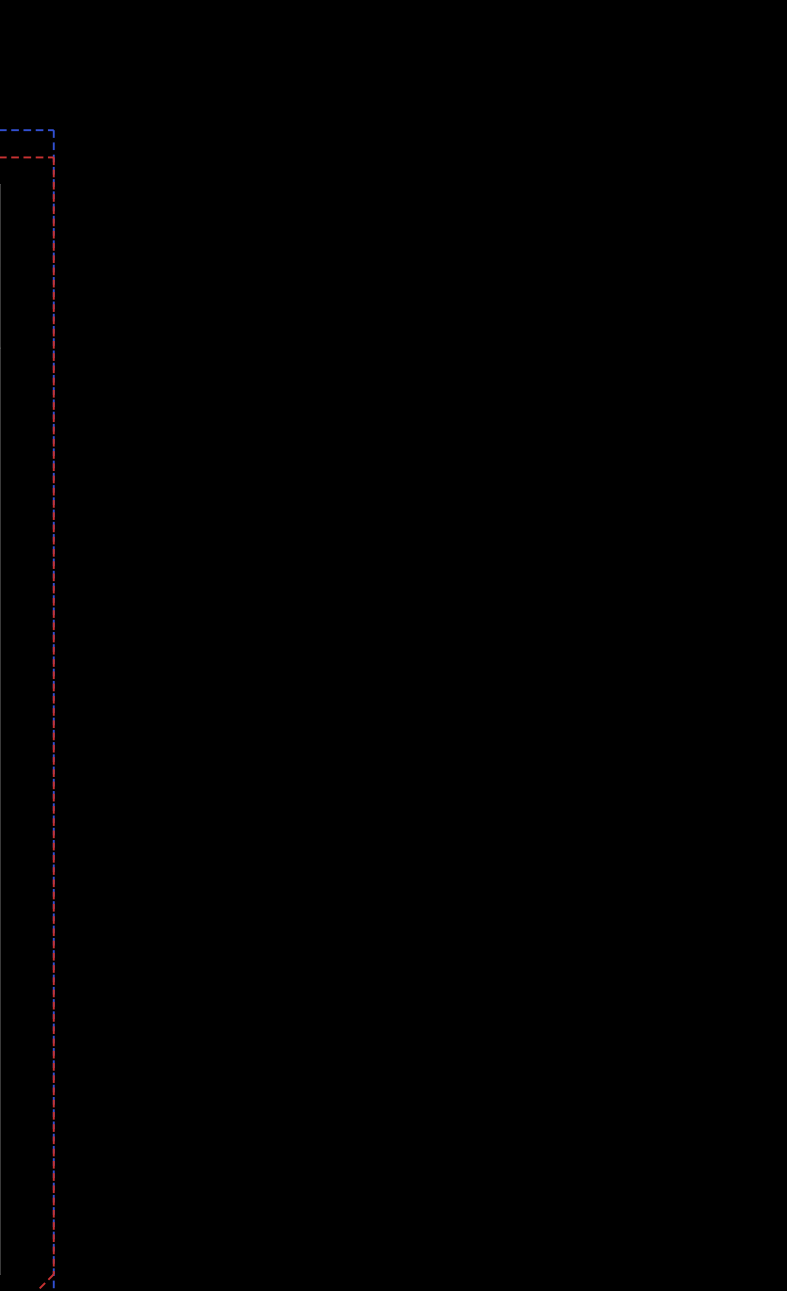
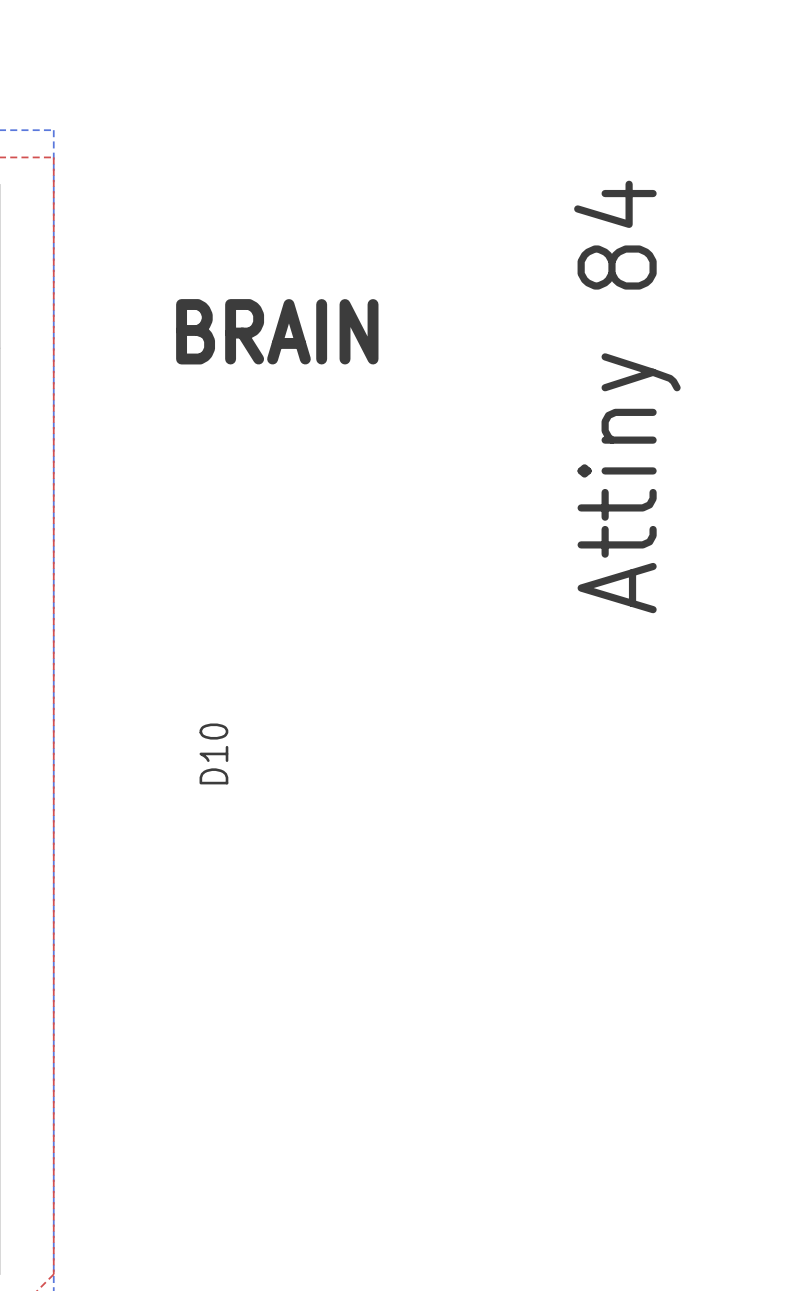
text: none -> BRAIN (277, 331)
text: none -> Attiny 84 (627, 396)
text: none -> D10 (213, 753)

